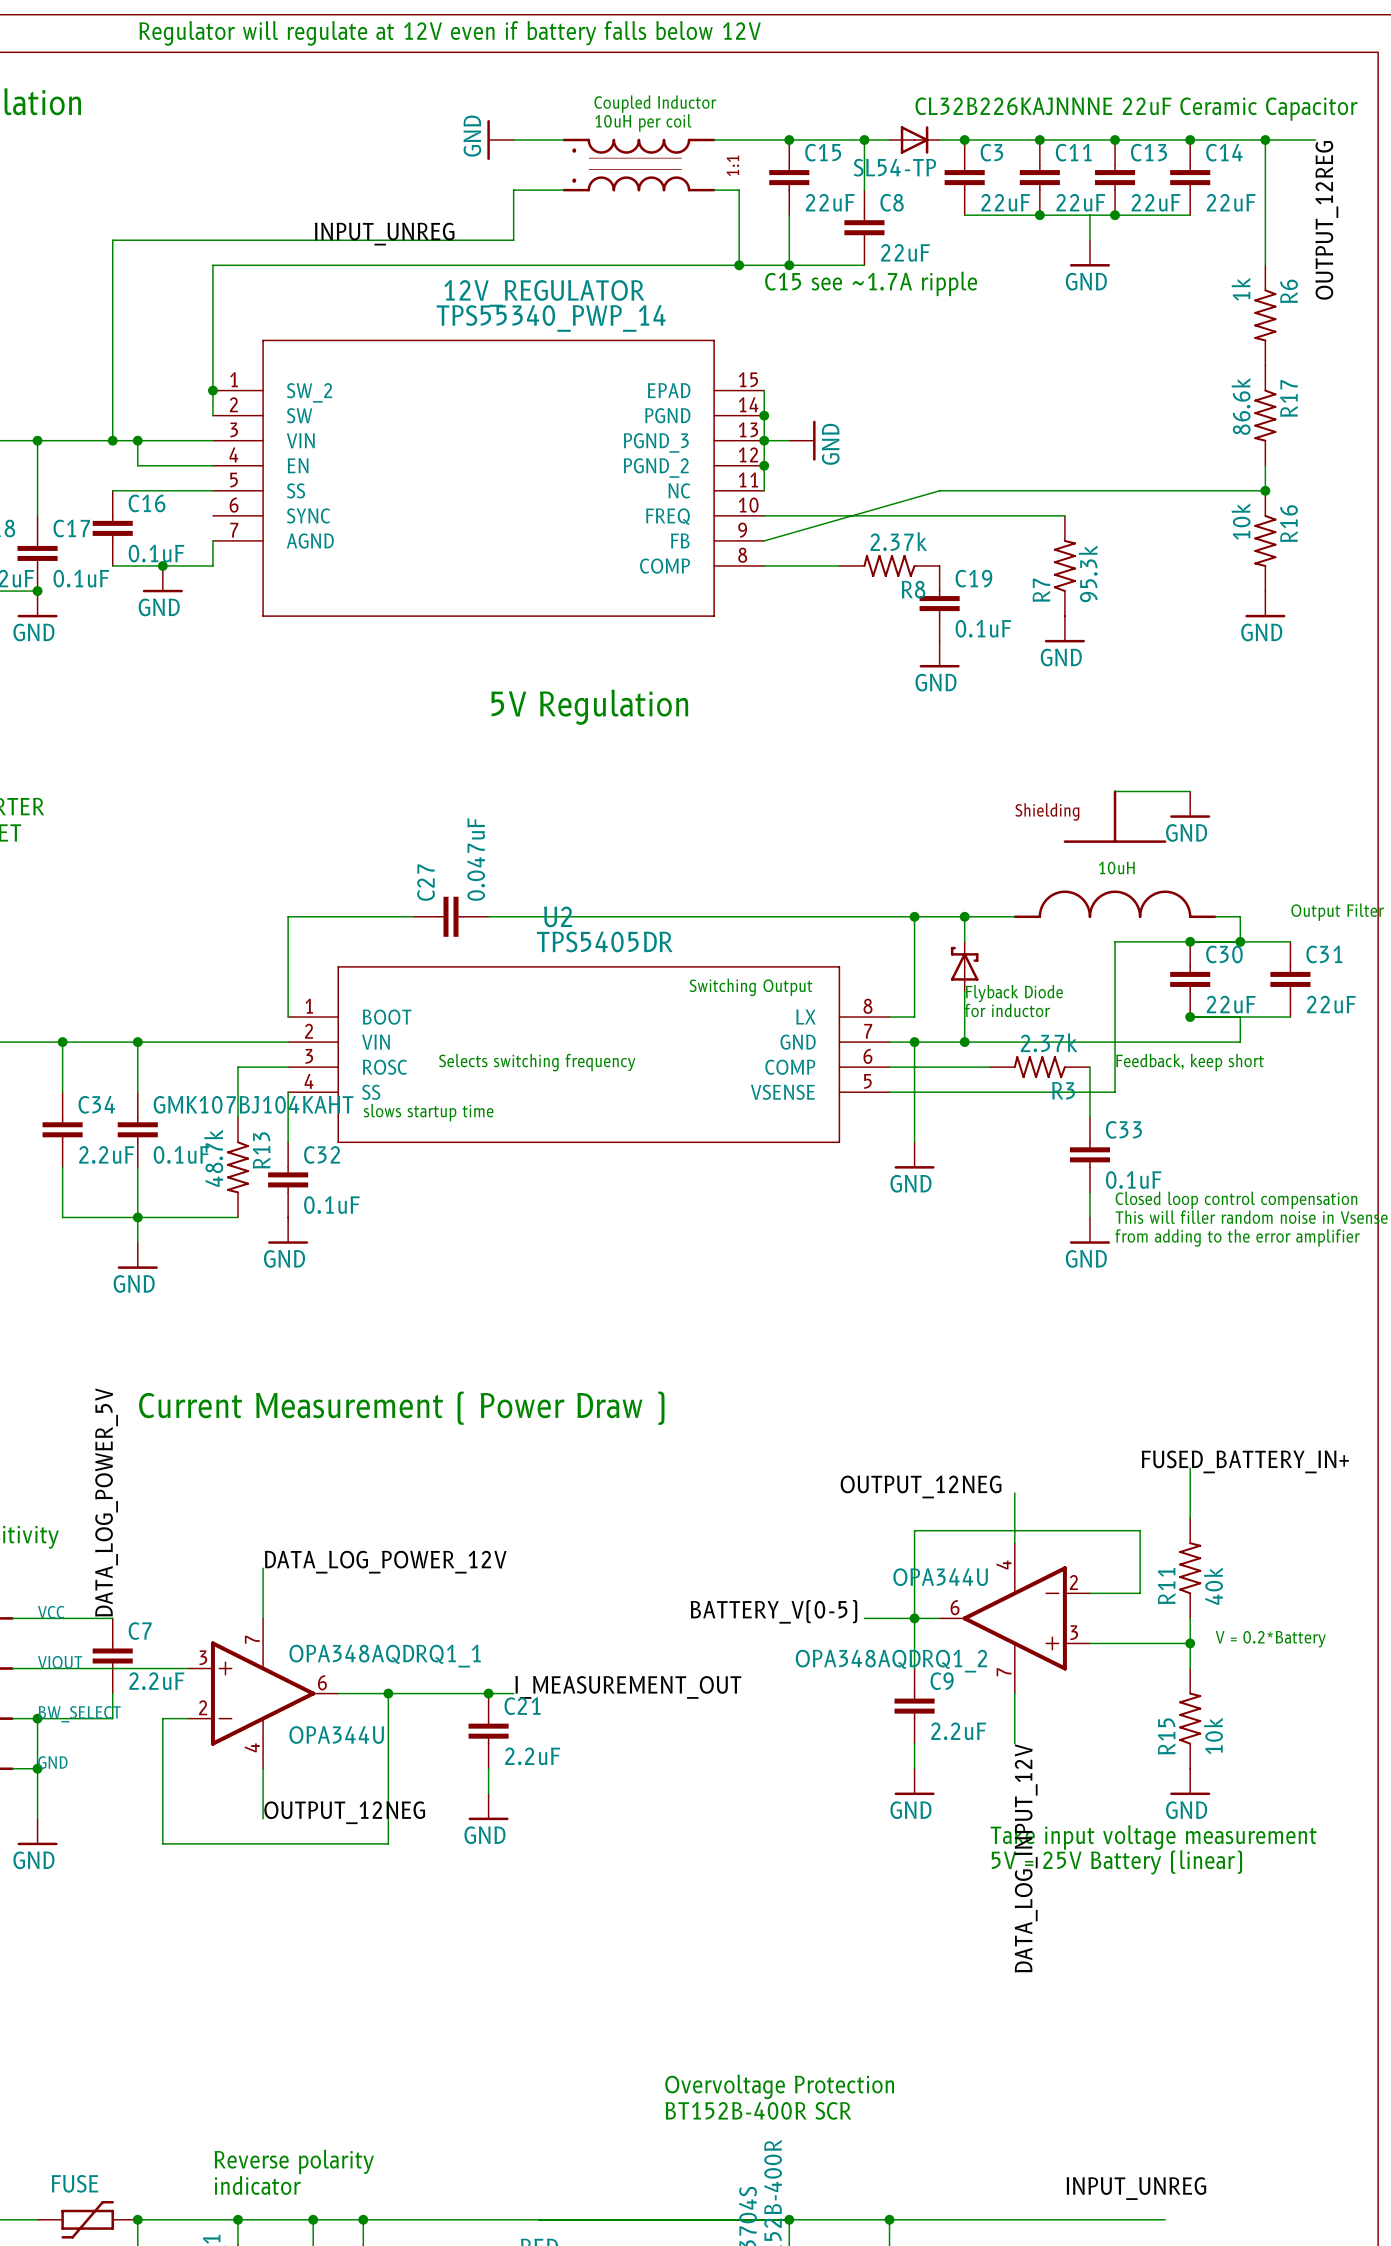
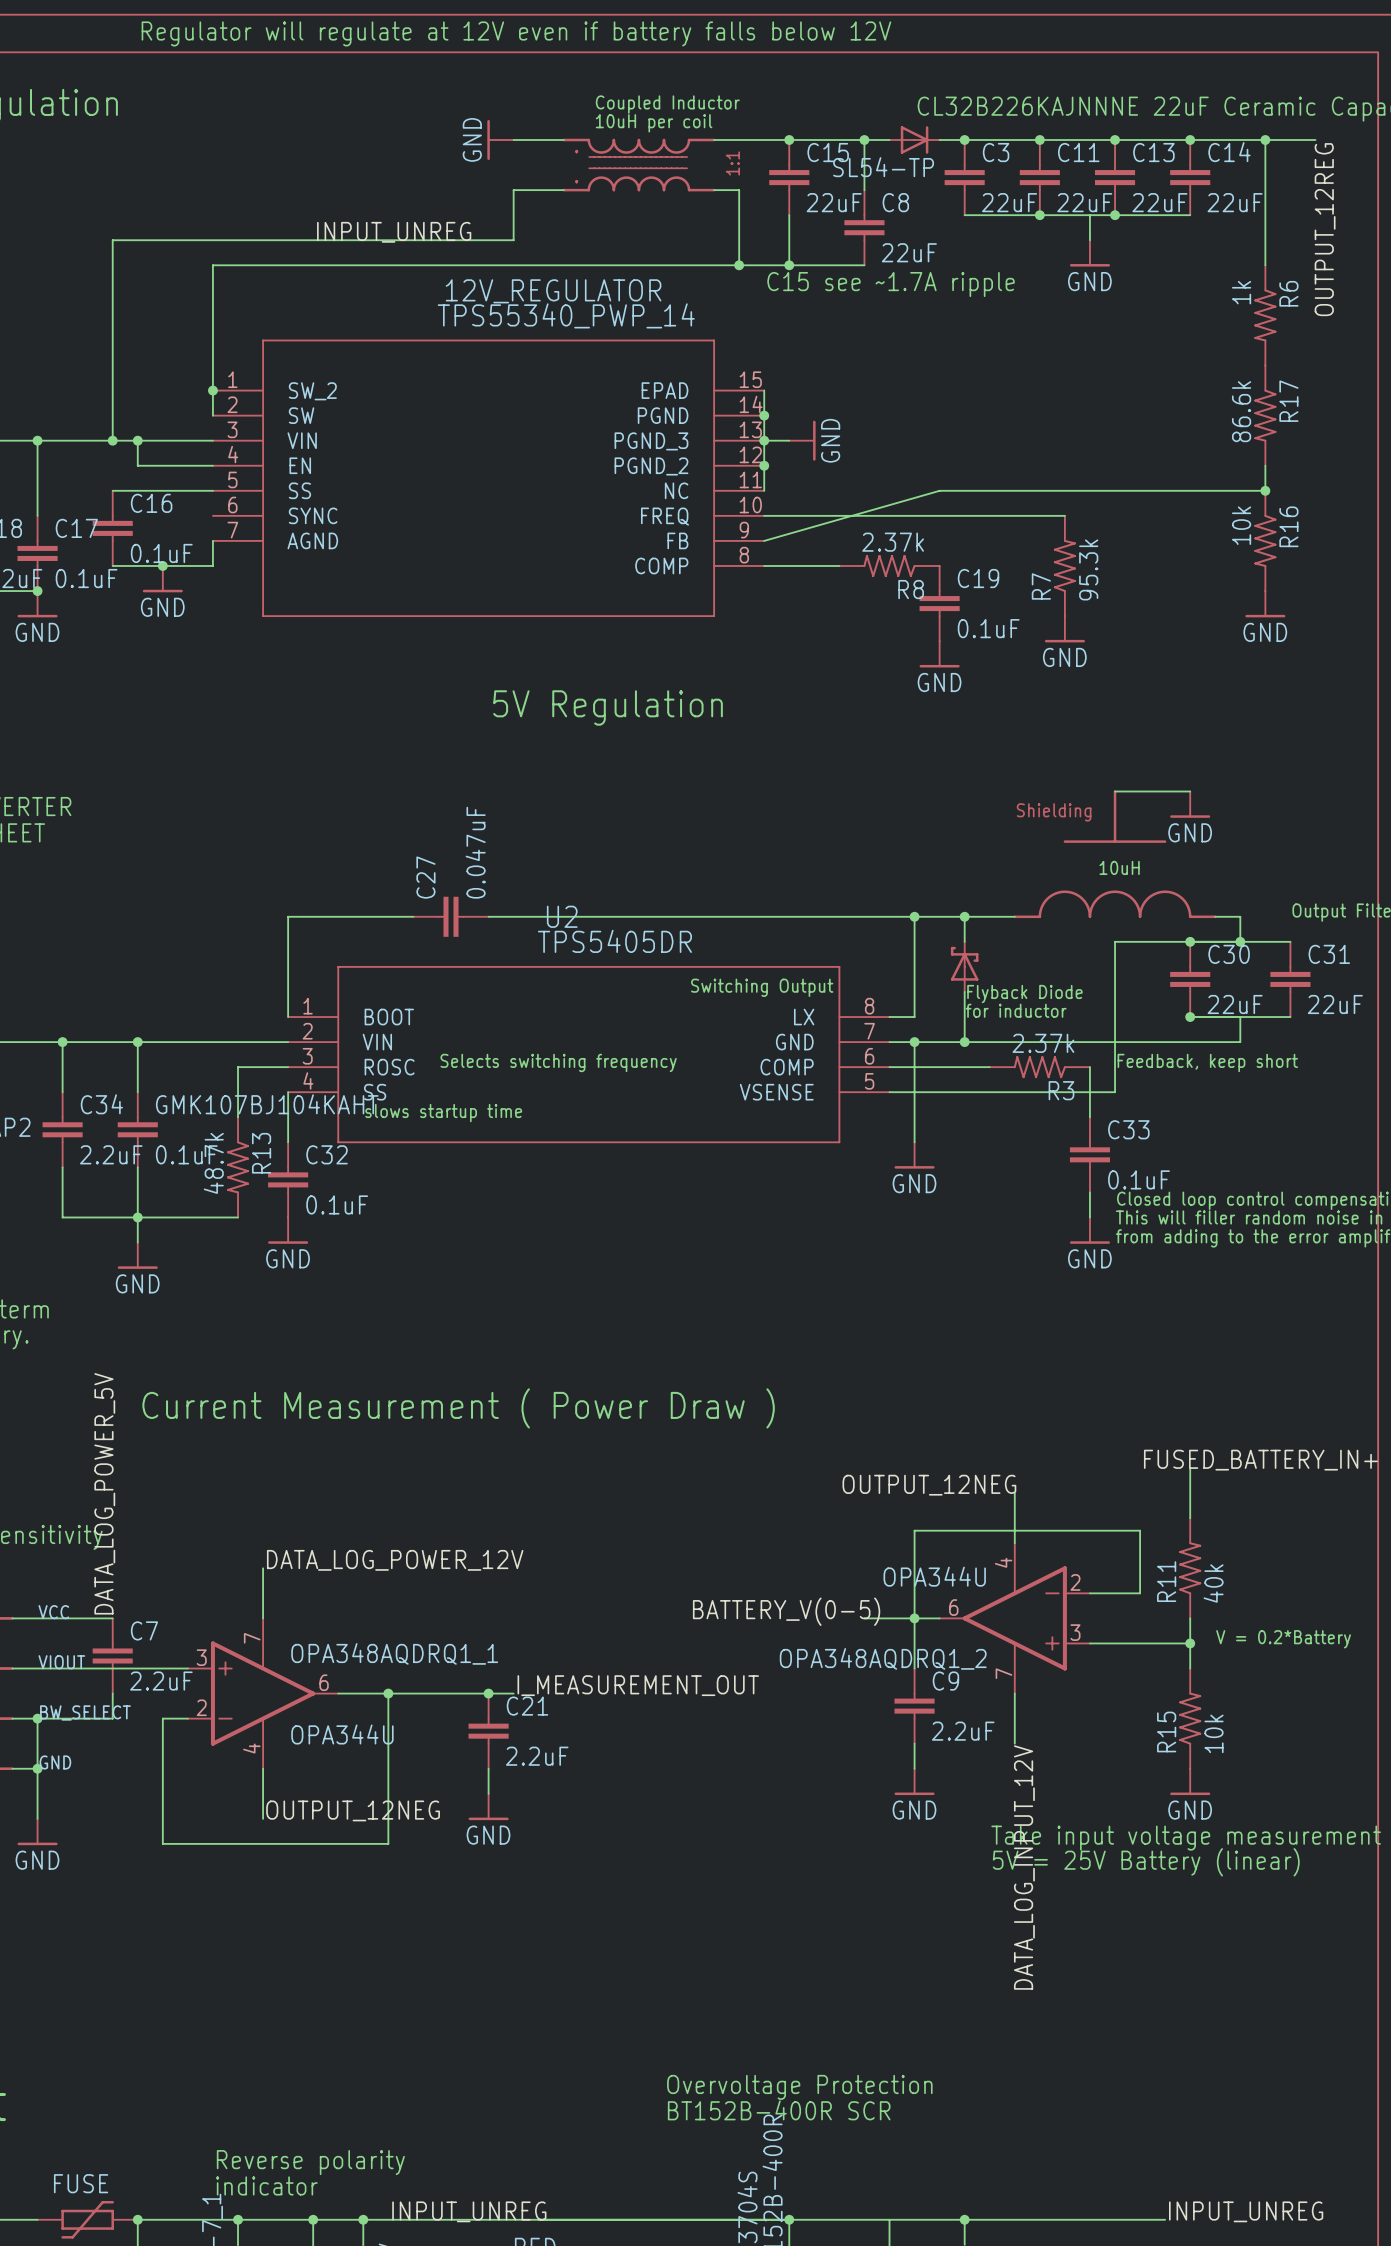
label position: INPUT_UNREG (1136, 2188) -> INPUT_UNREG (1246, 2211)
label: none -> INPUT_UNREG (469, 2211)
junction: (889, 2219) -> none
wire: none -> (964, 2219) (964, 2244)
junction: none -> (964, 2219)

